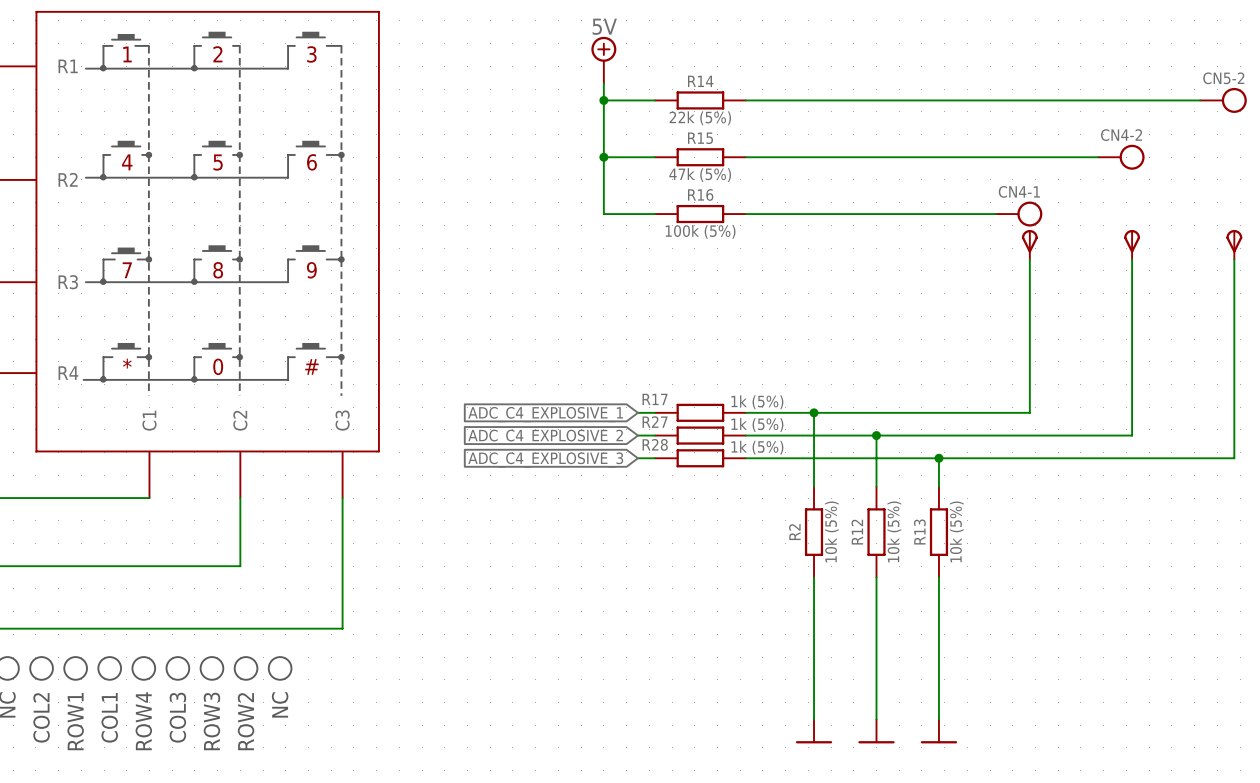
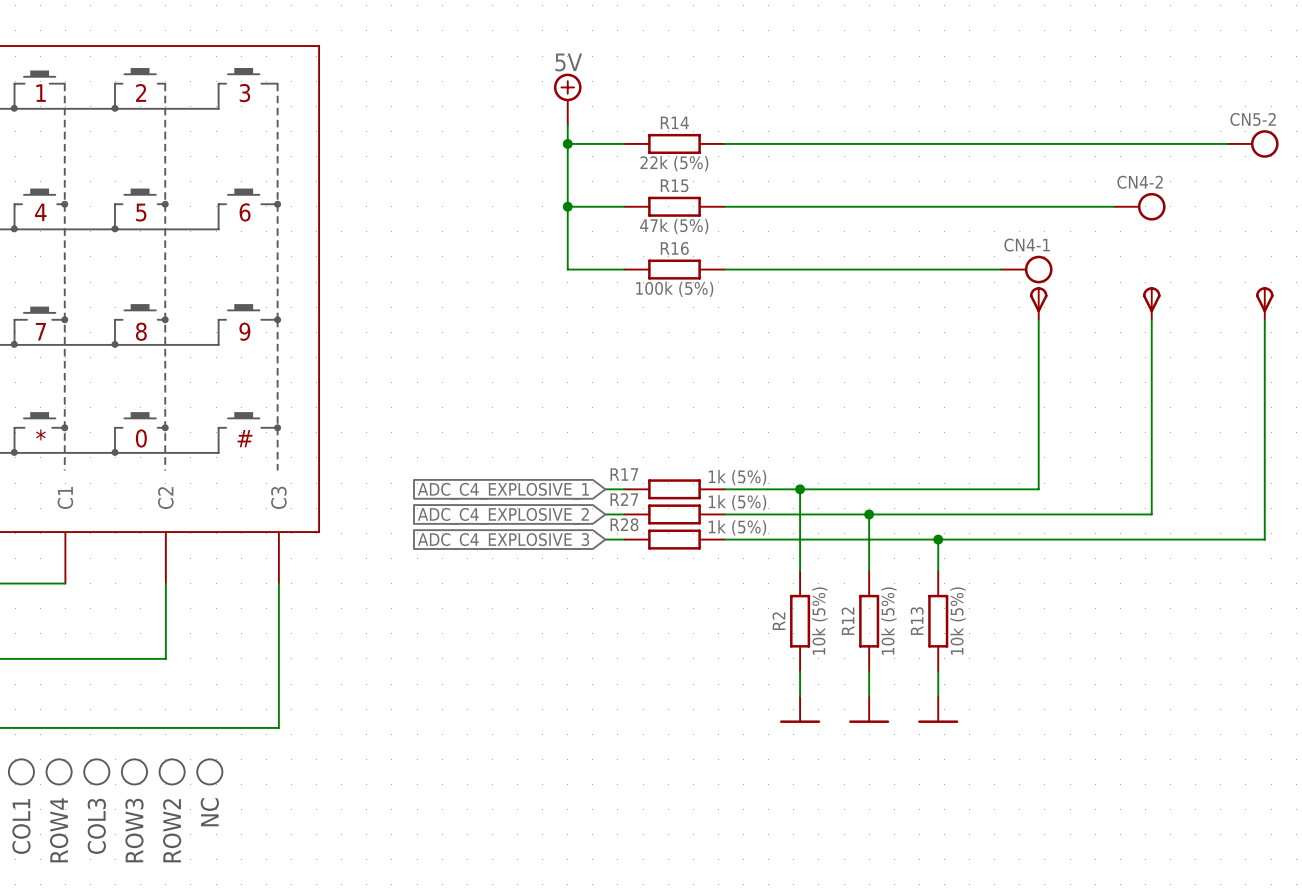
wire: (814, 600) (814, 719) -> none
wire: (876, 600) (876, 719) -> none
wire: (938, 600) (938, 719) -> none
power symbol: none -> (800, 709)
power symbol: none -> (869, 709)
power symbol: none -> (938, 709)
power symbol: (814, 731) -> none
power symbol: (876, 731) -> none
power symbol: (938, 731) -> none

